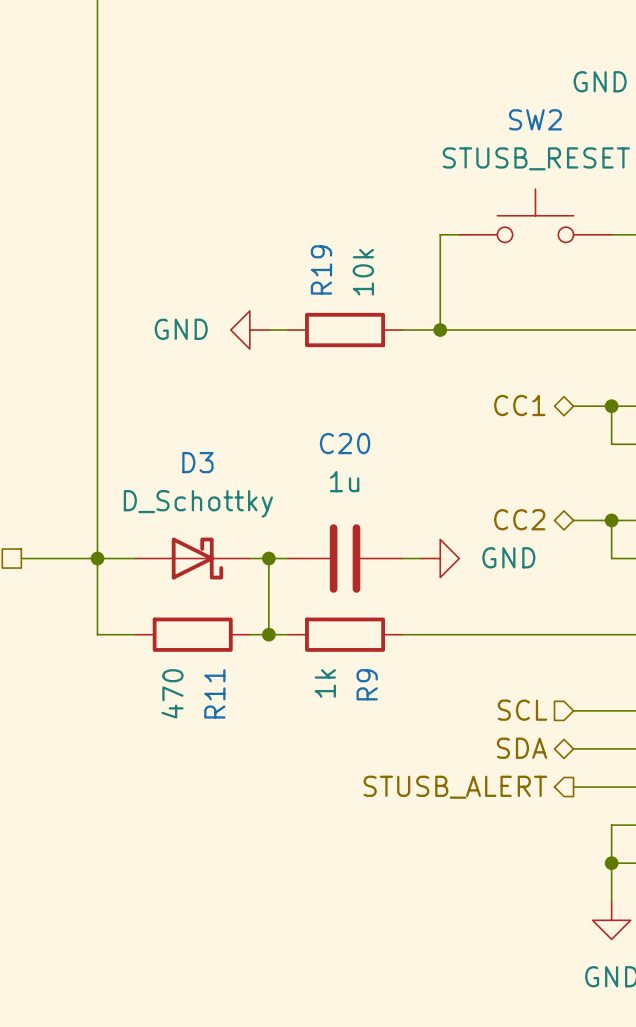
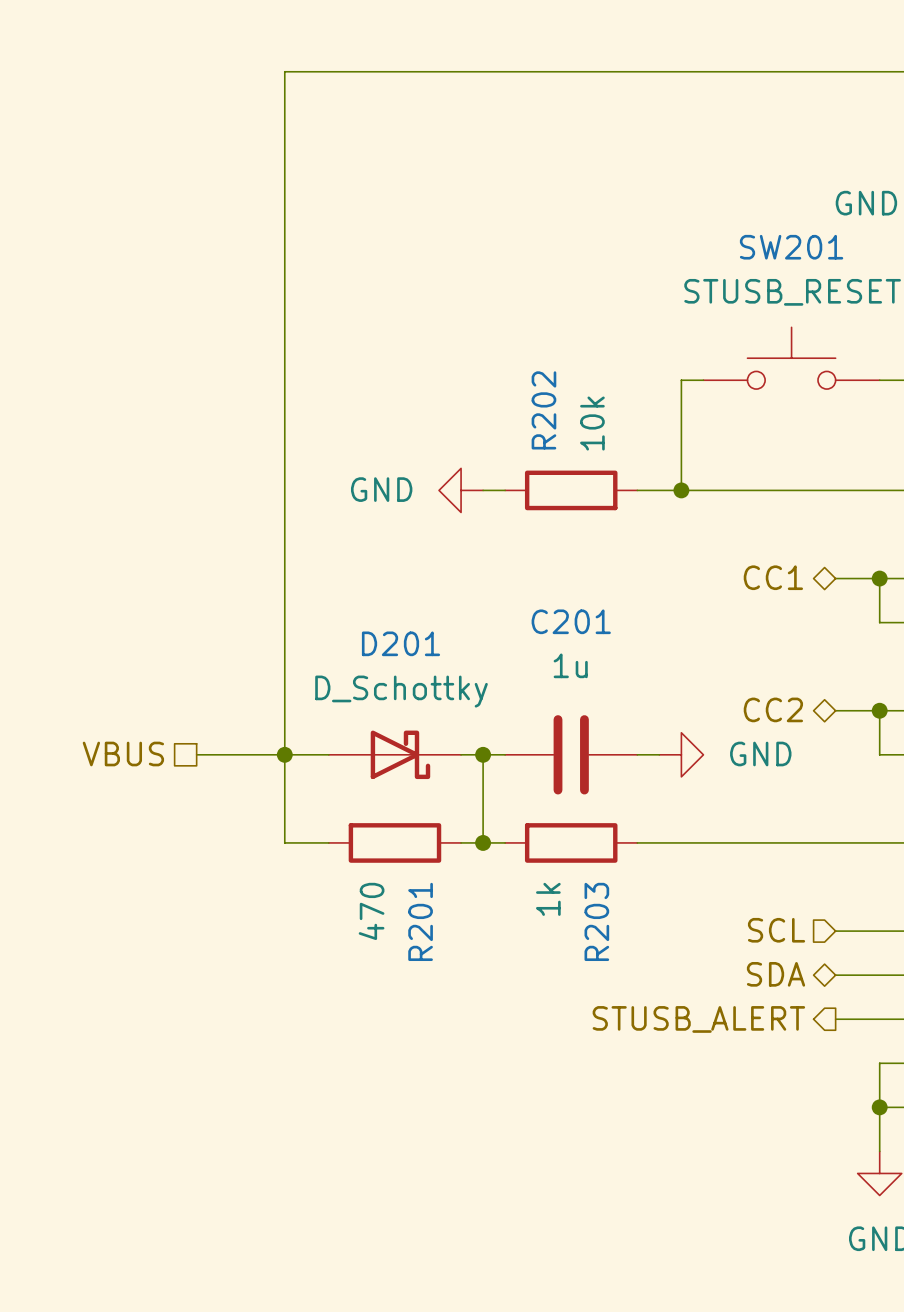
SW2 name: SW2 (535, 119) -> SW201 (791, 247)
R19 name: R19 (321, 269) -> R202 (543, 410)
C20 name: C20 (345, 443) -> C201 (571, 621)
D3 name: D3 (197, 462) -> D201 (400, 643)
R9 name: R9 (367, 684) -> R203 (596, 921)
R11 name: R11 (214, 693) -> R201 (420, 921)

